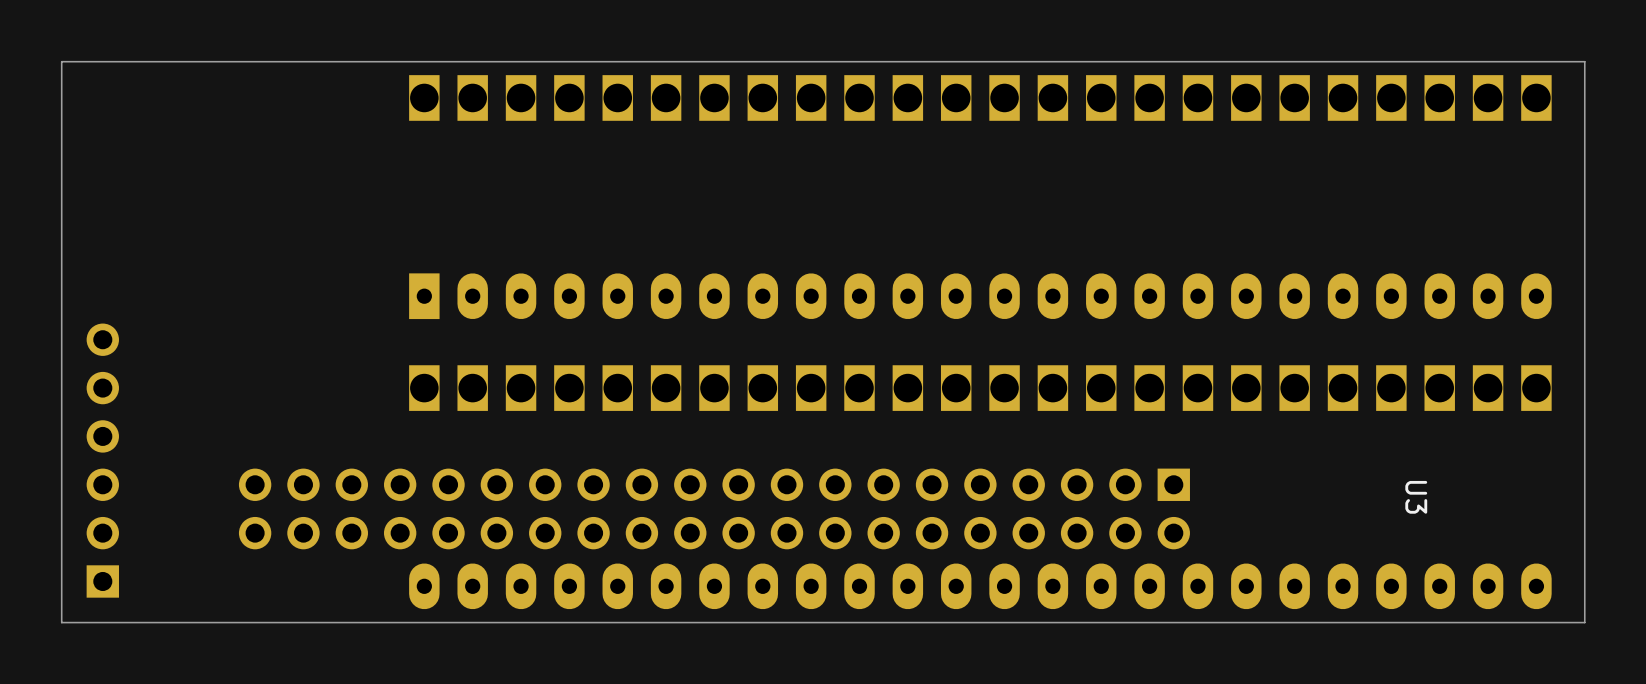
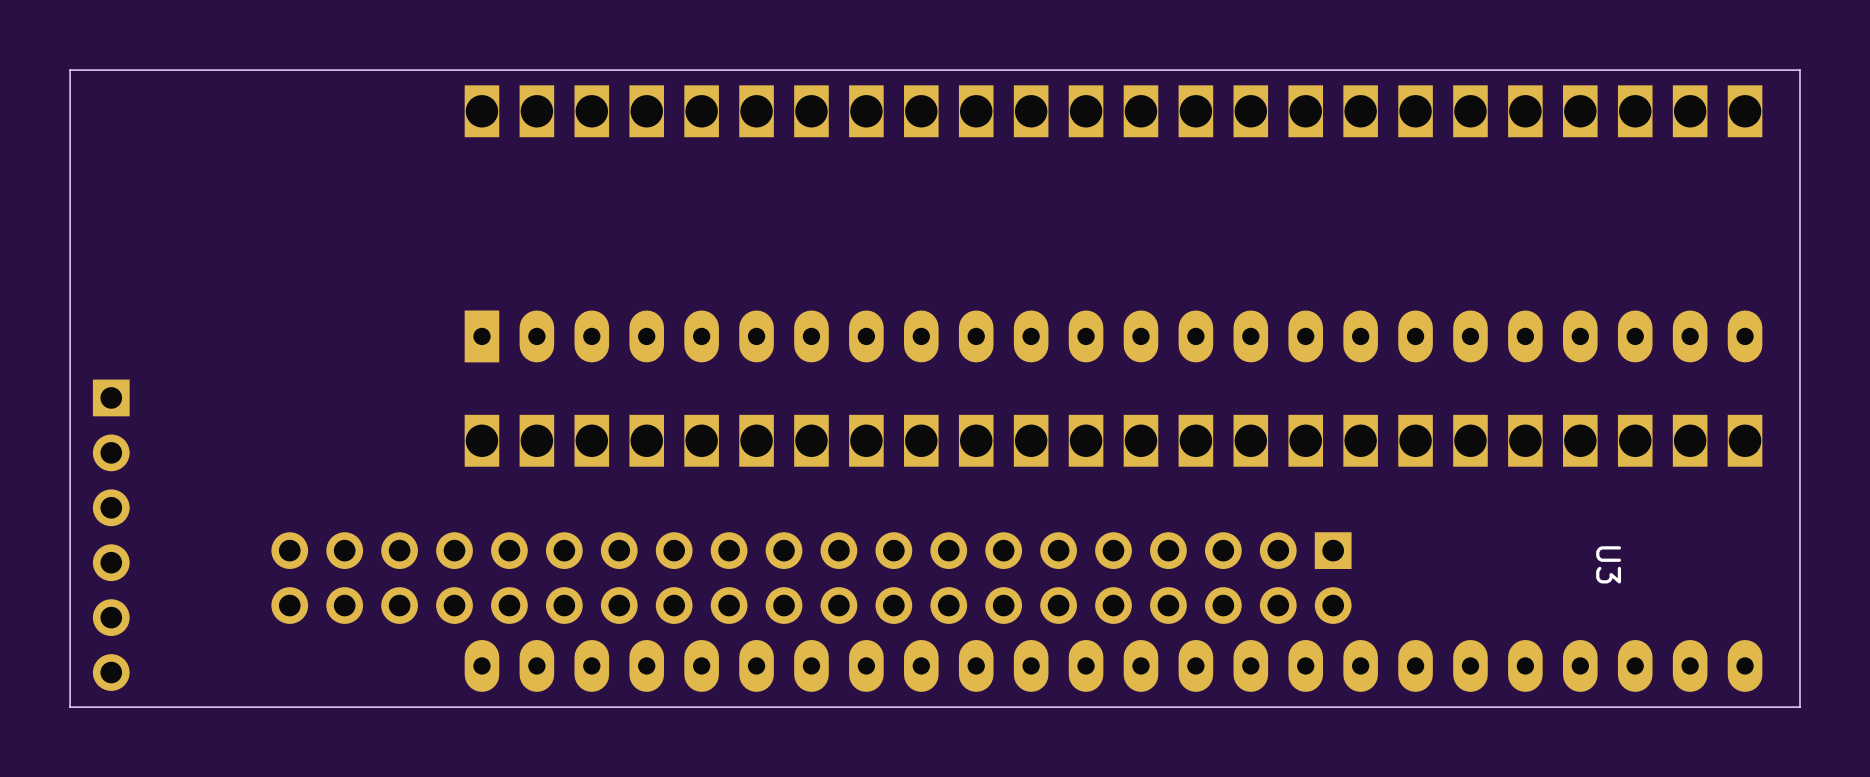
part rotation: 0° (102, 460) -> 180° (111, 535)

